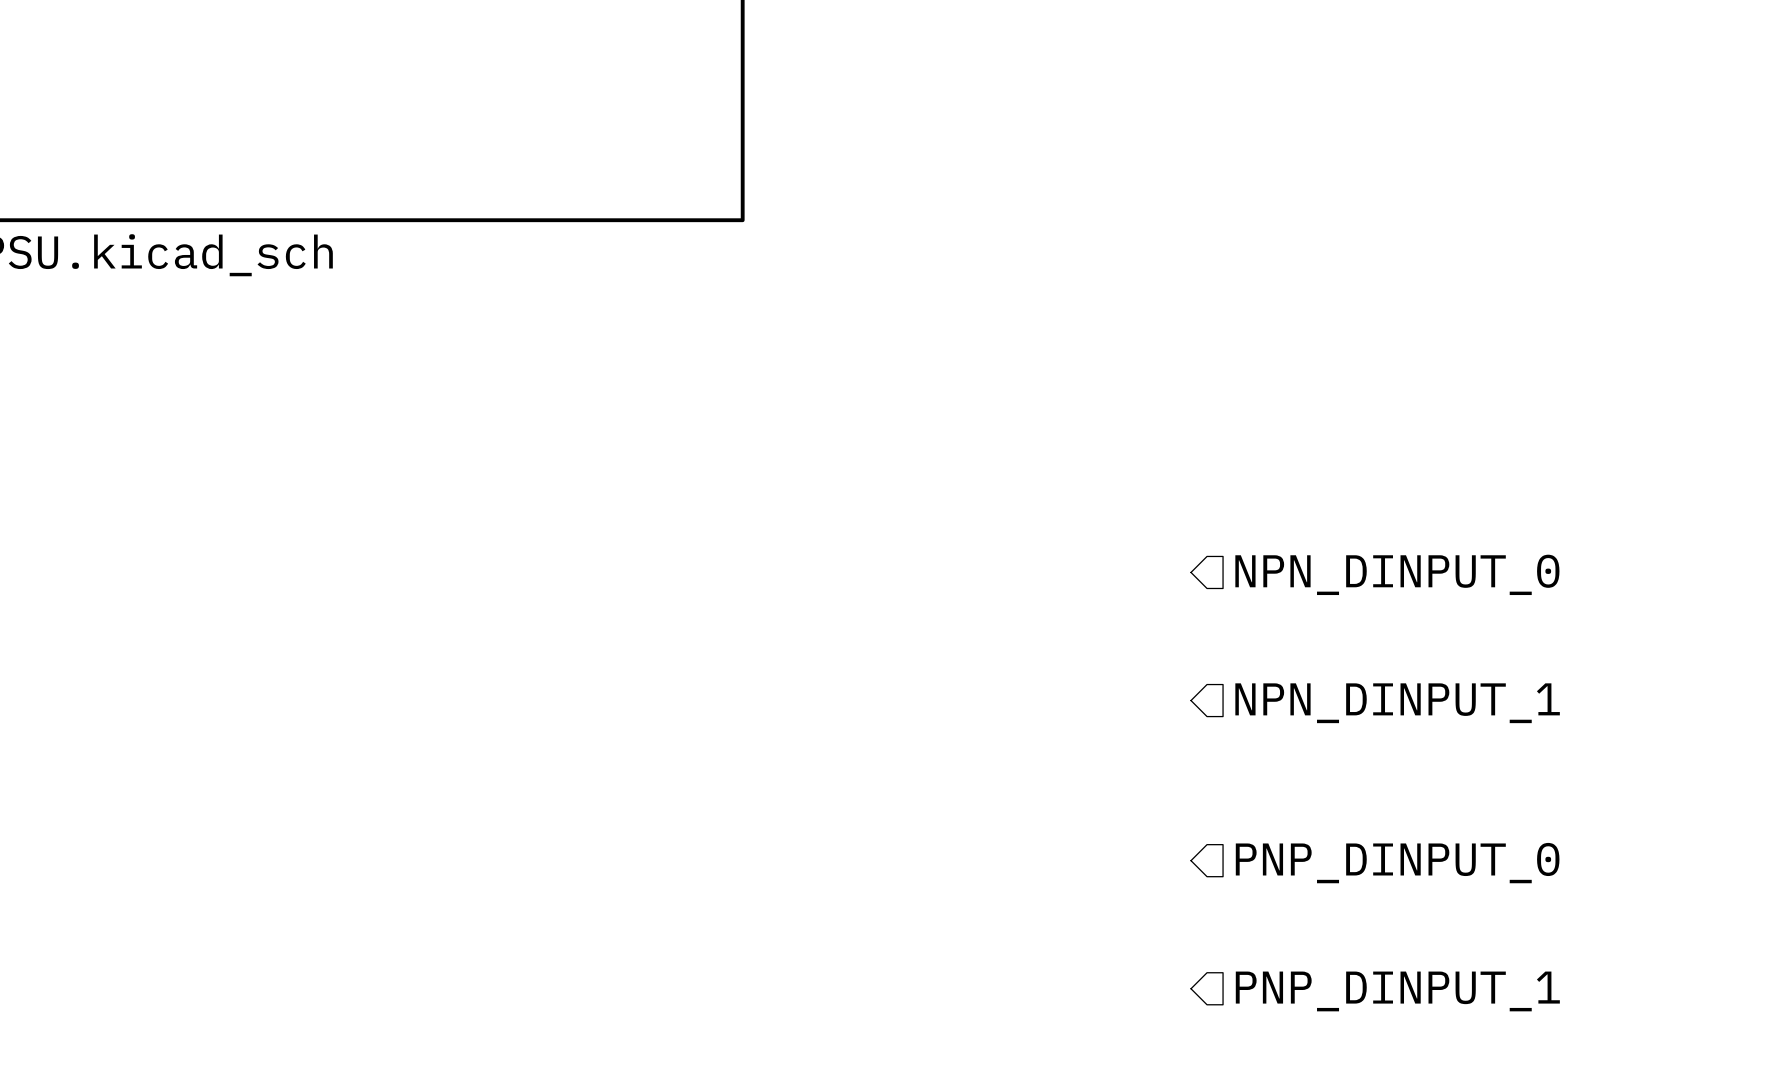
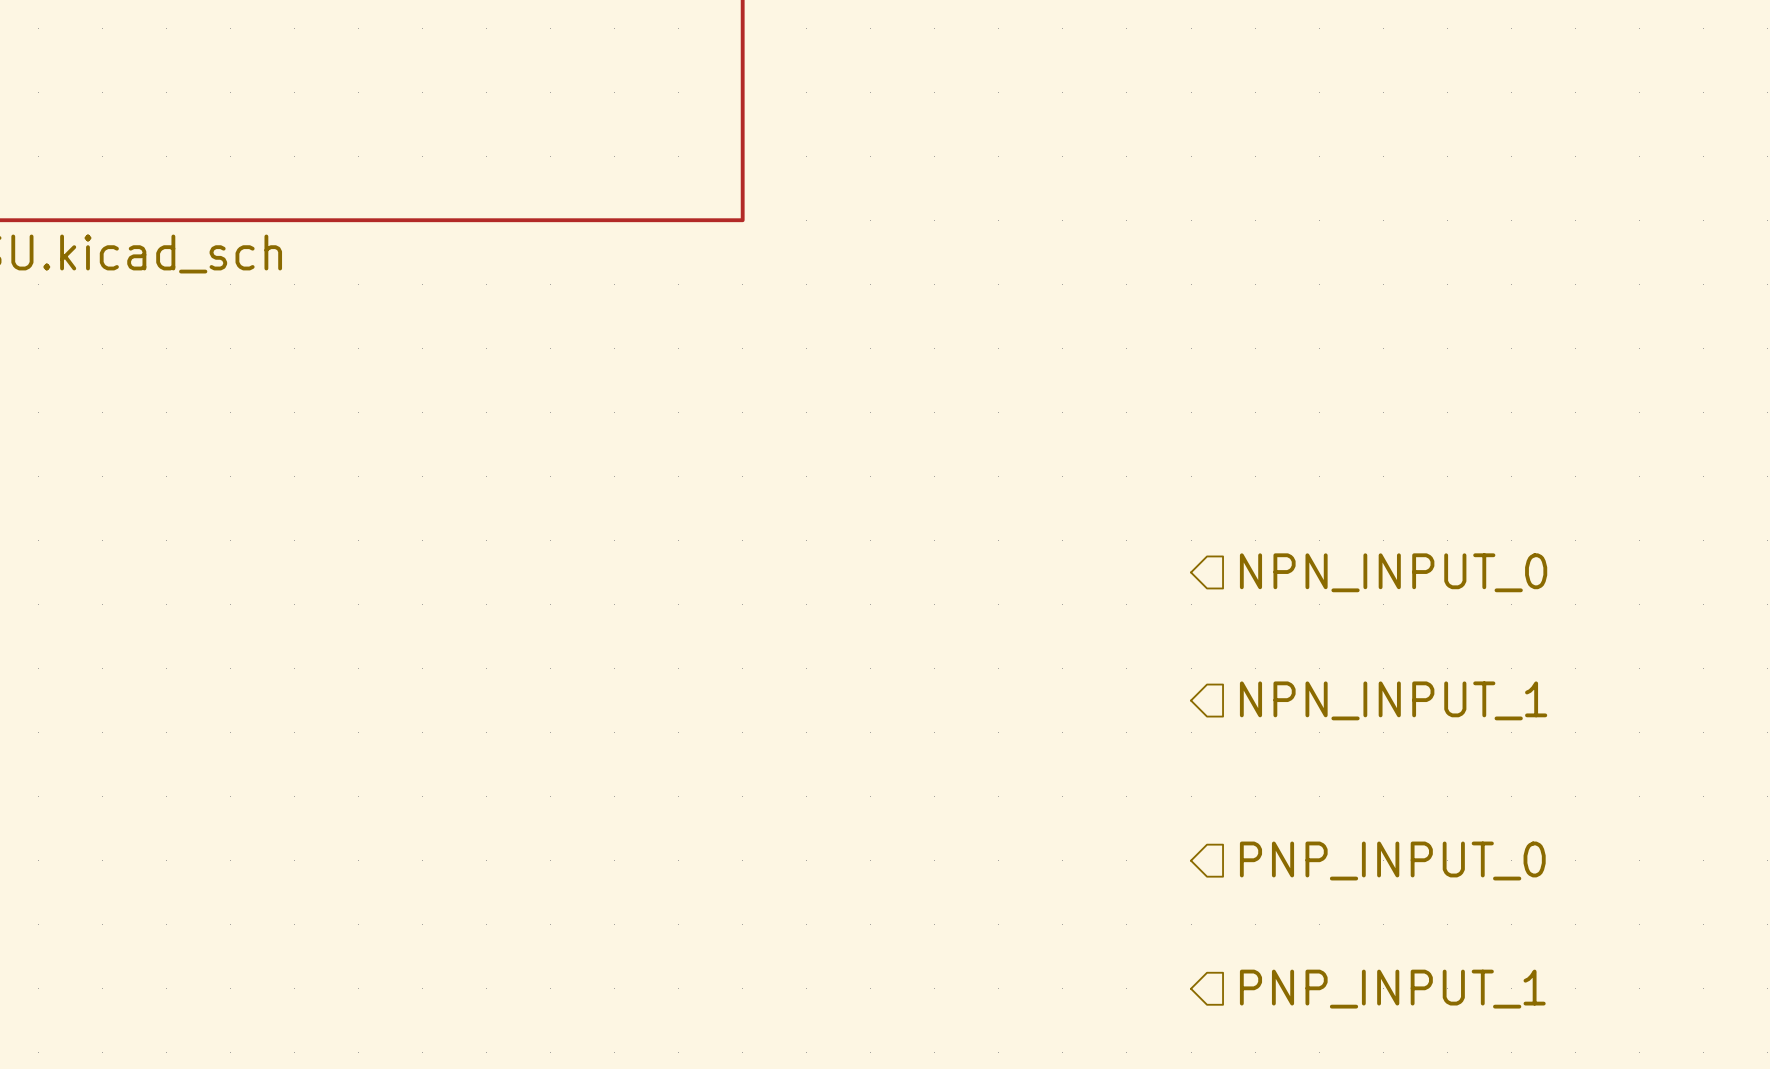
hierarchical label: NPN_DINPUT_0 (1397, 574) -> NPN_INPUT_0 (1393, 572)
hierarchical label: NPN_DINPUT_1 (1397, 703) -> NPN_INPUT_1 (1393, 700)
hierarchical label: PNP_DINPUT_0 (1397, 863) -> PNP_INPUT_0 (1392, 861)
hierarchical label: PNP_DINPUT_1 (1397, 991) -> PNP_INPUT_1 (1392, 989)

